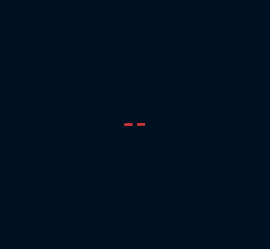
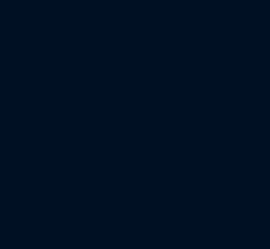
top zone outline: (124, 124) (145, 124) (124, 124) -> none

